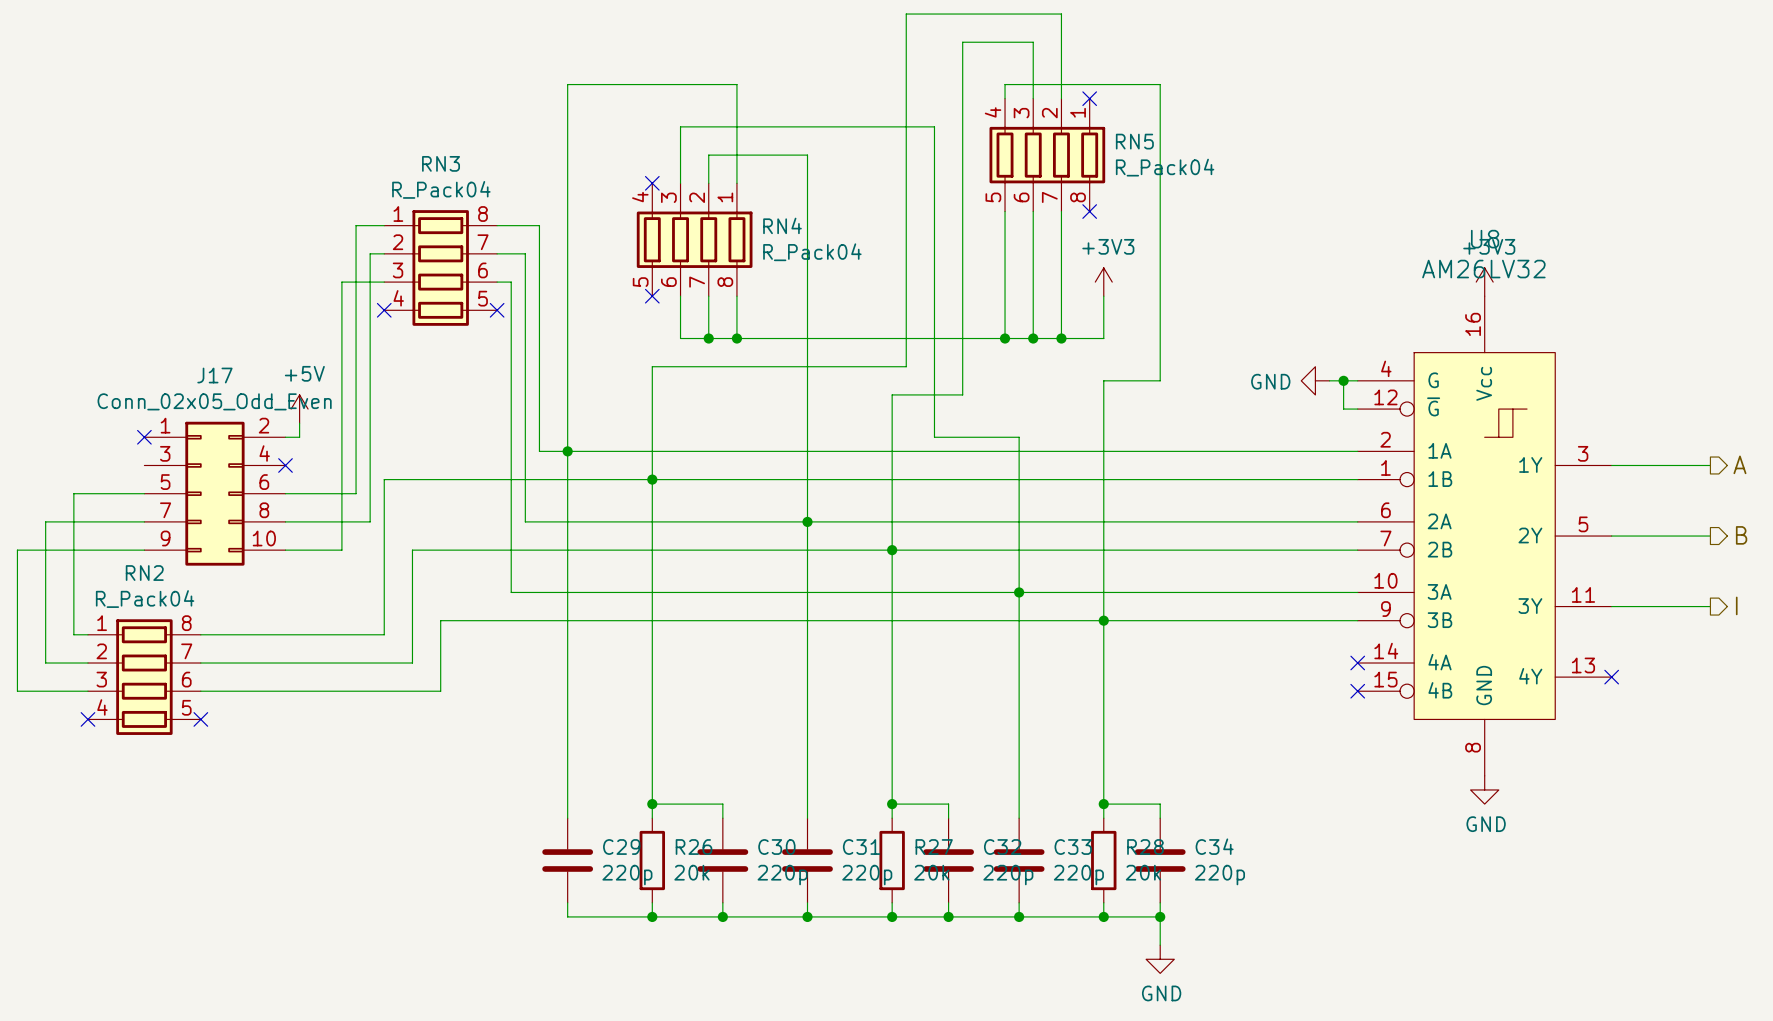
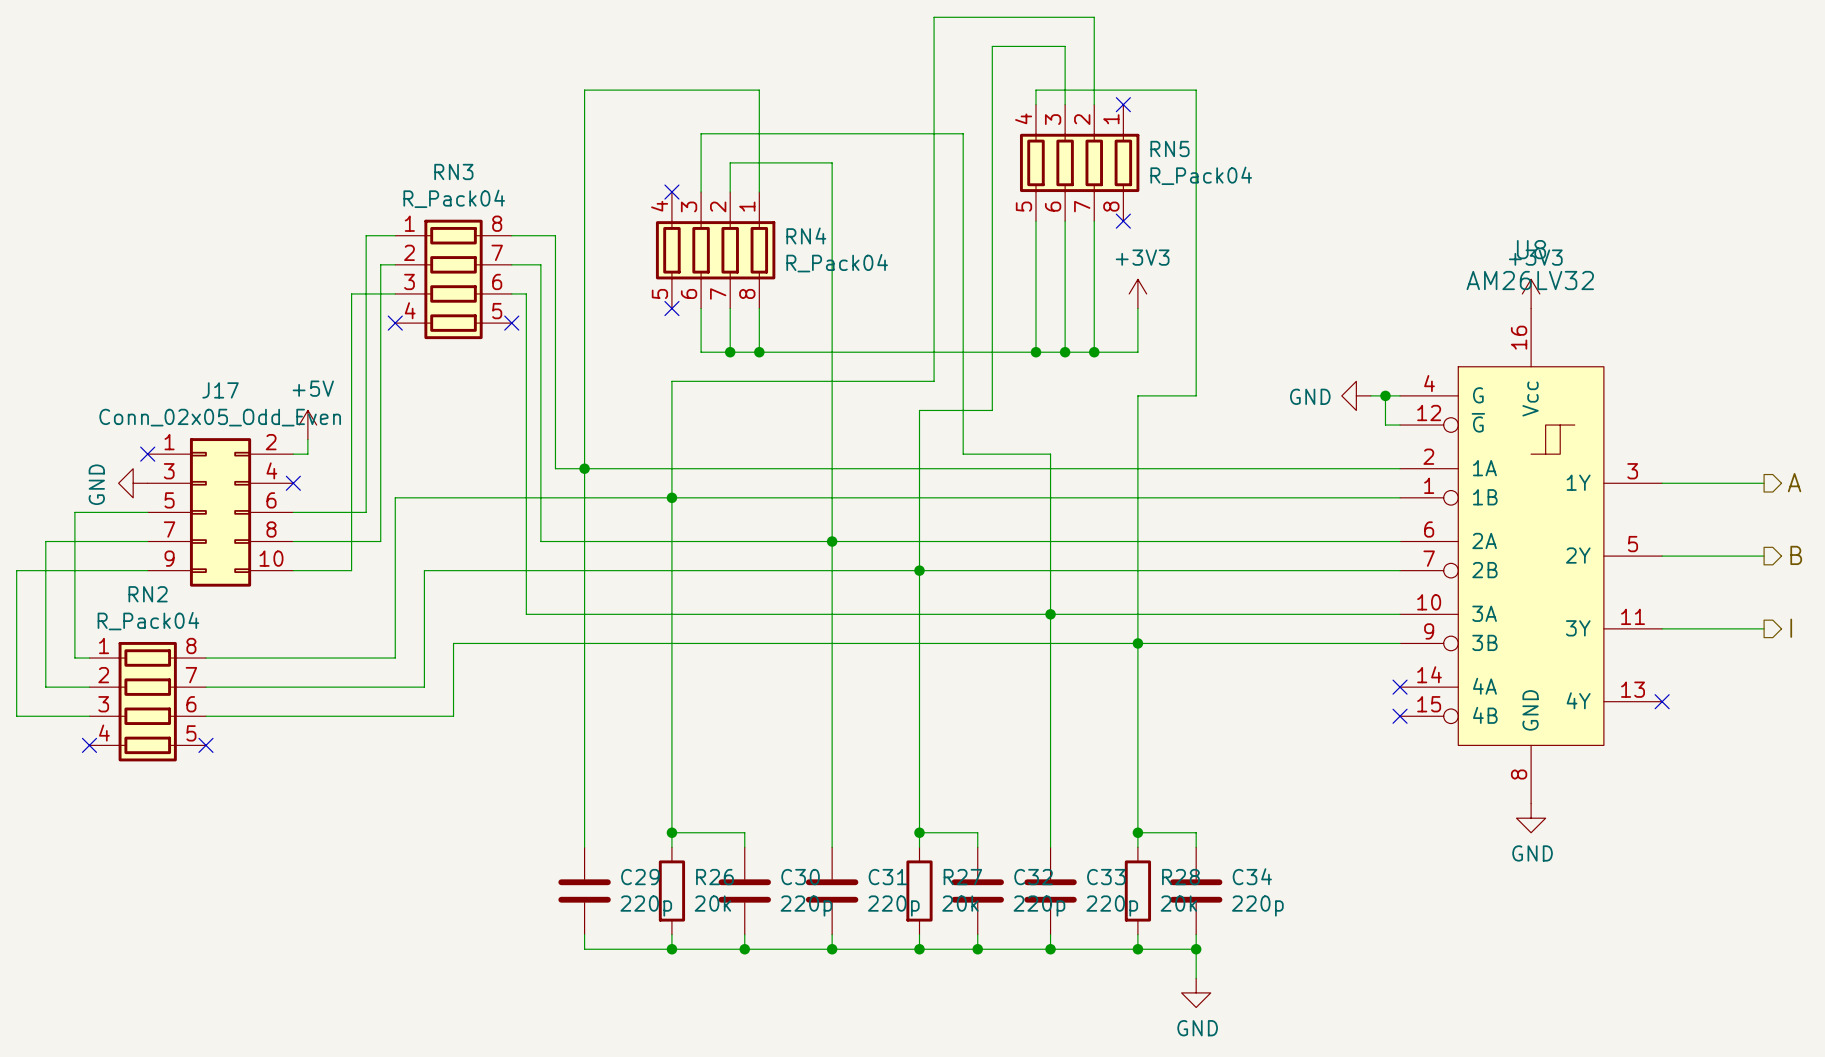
power symbol: none -> GND (133, 483)

